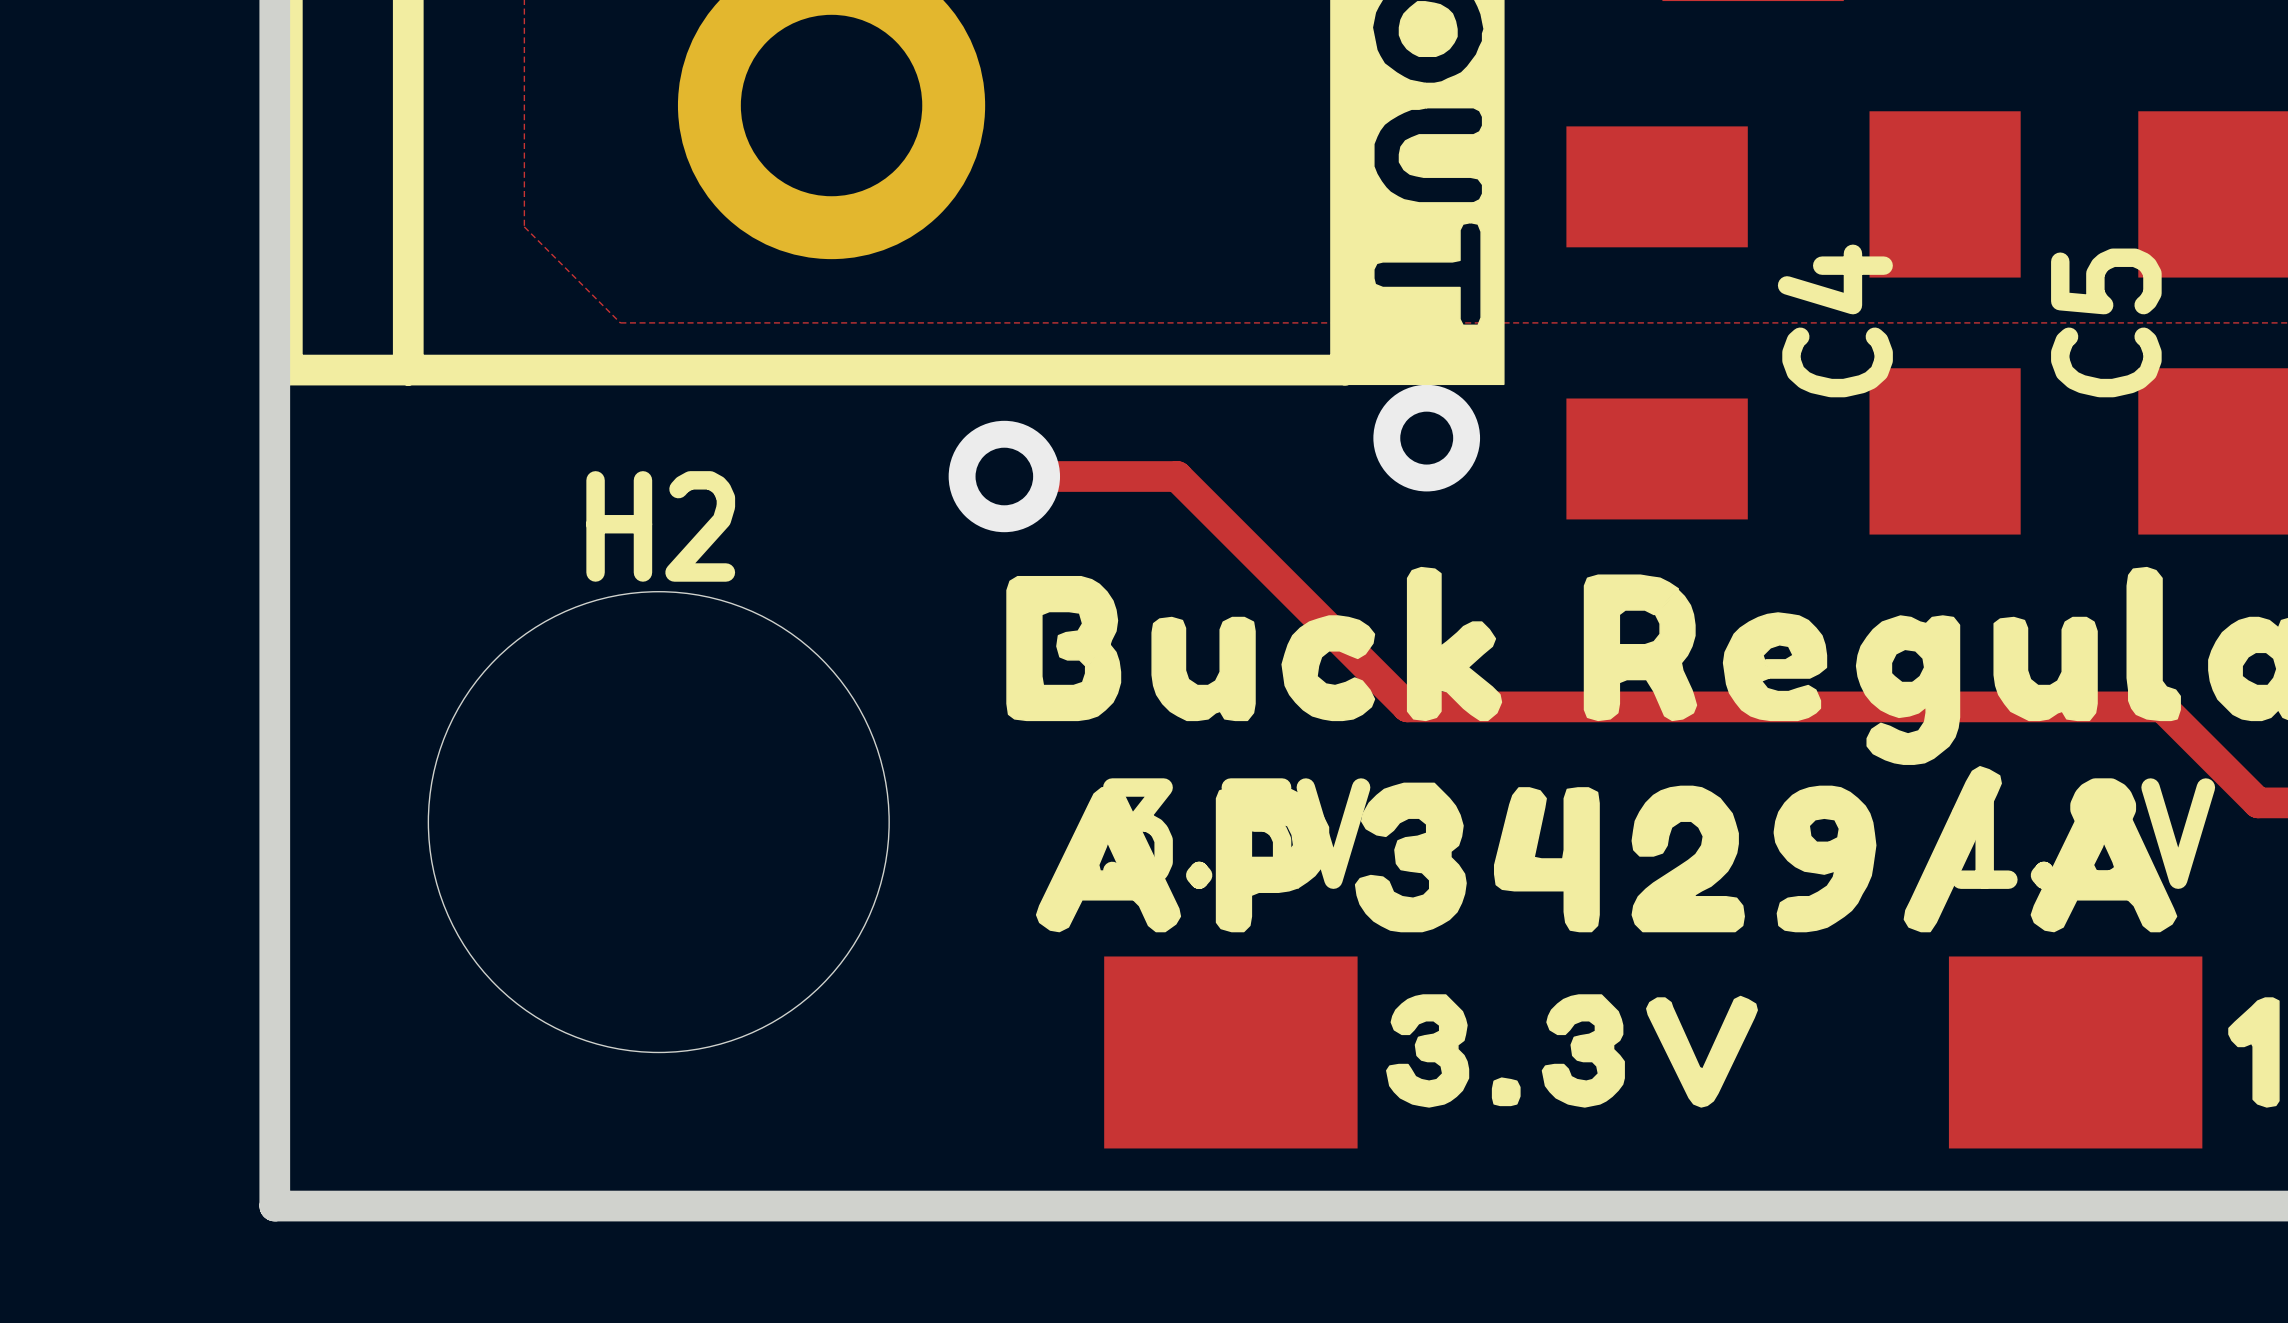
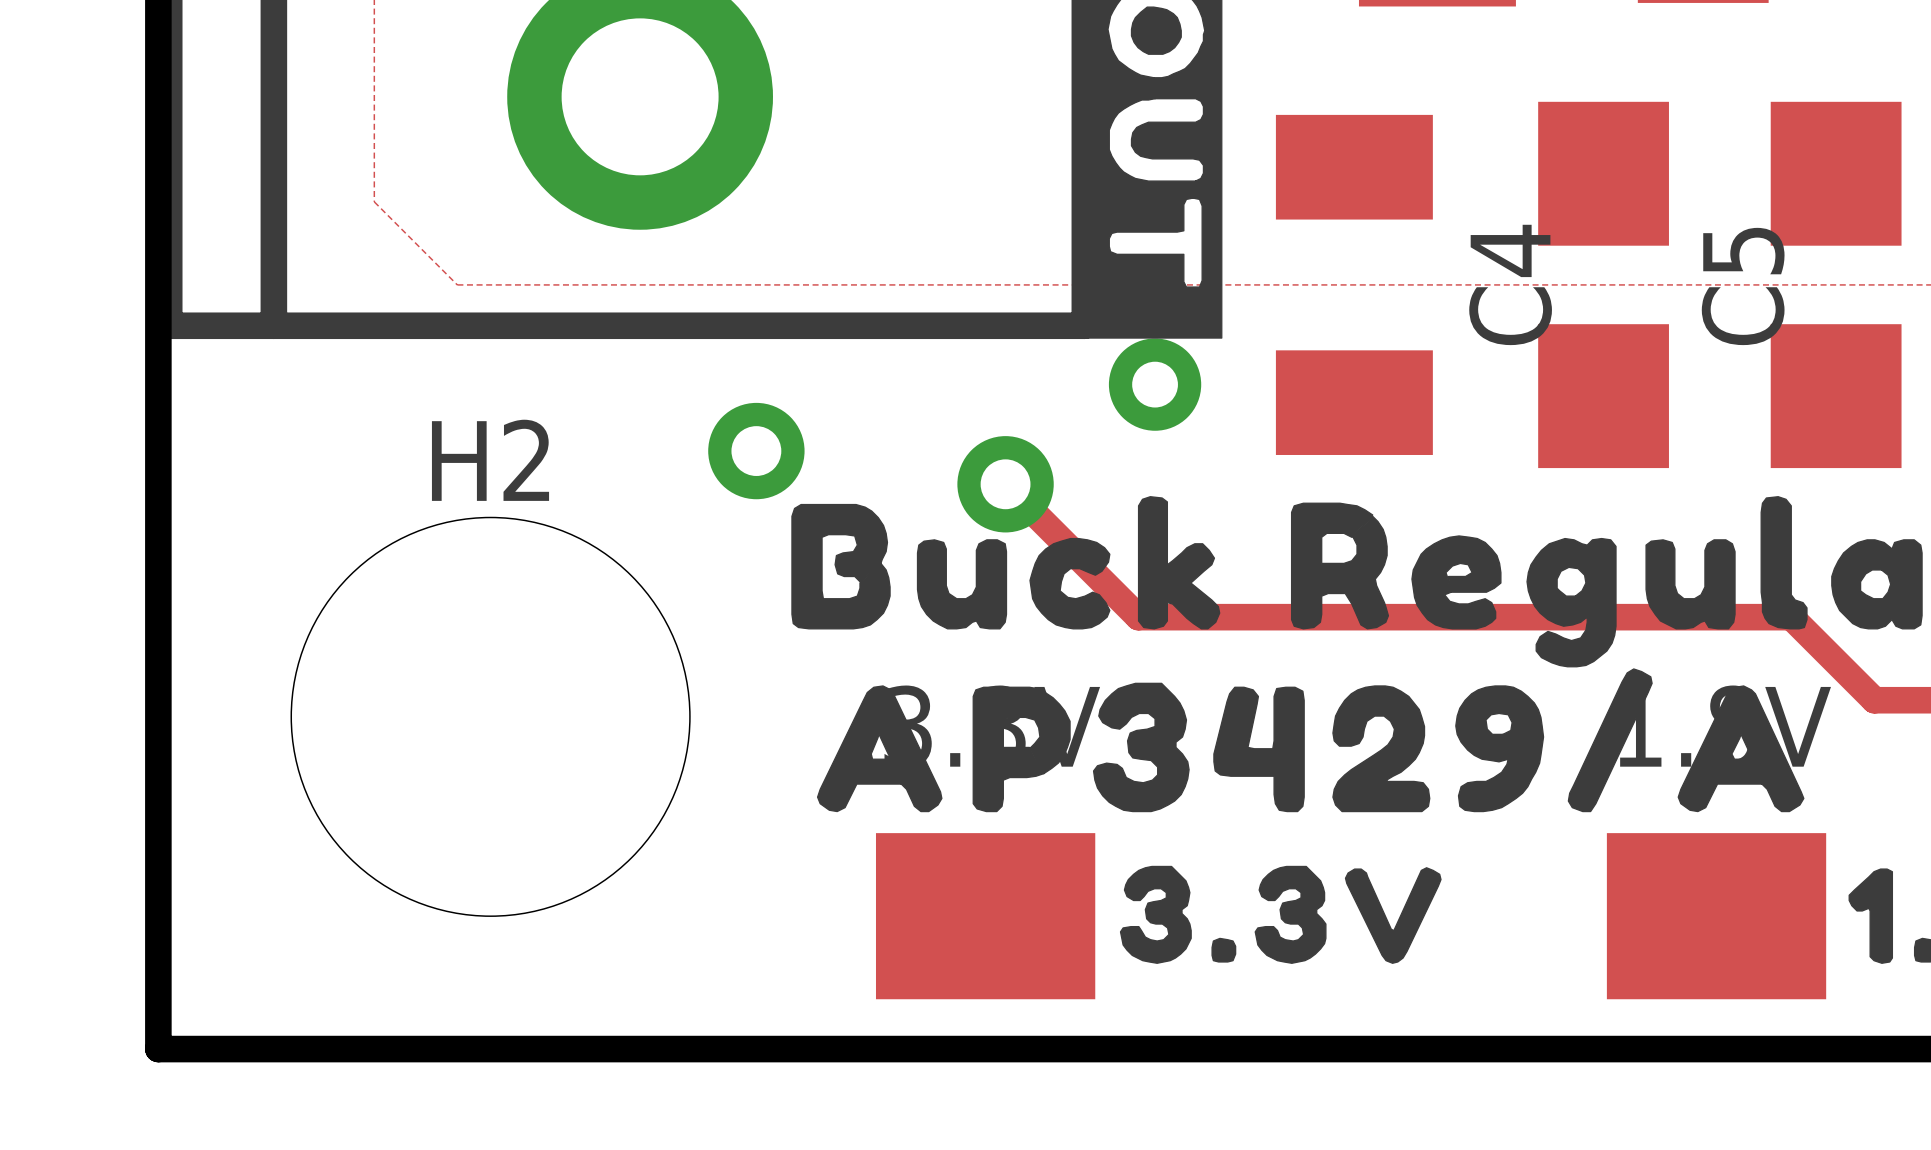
track: (1004, 476) (1177, 476) (1253, 553) -> none
via position: (1004, 476) -> (756, 451)
via: none -> (1005, 484)

